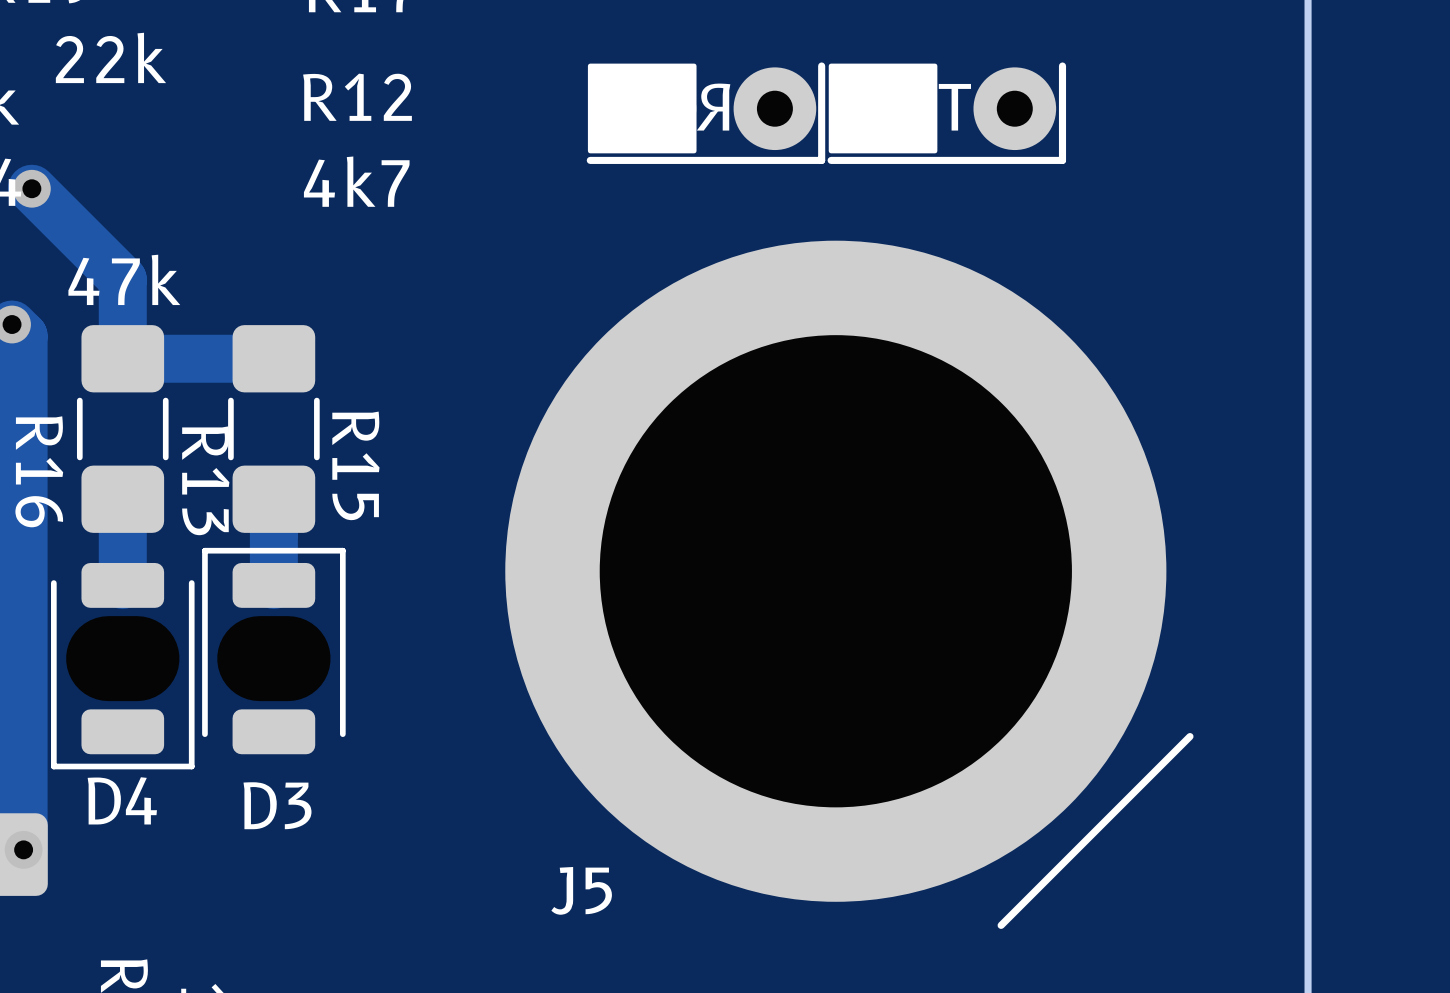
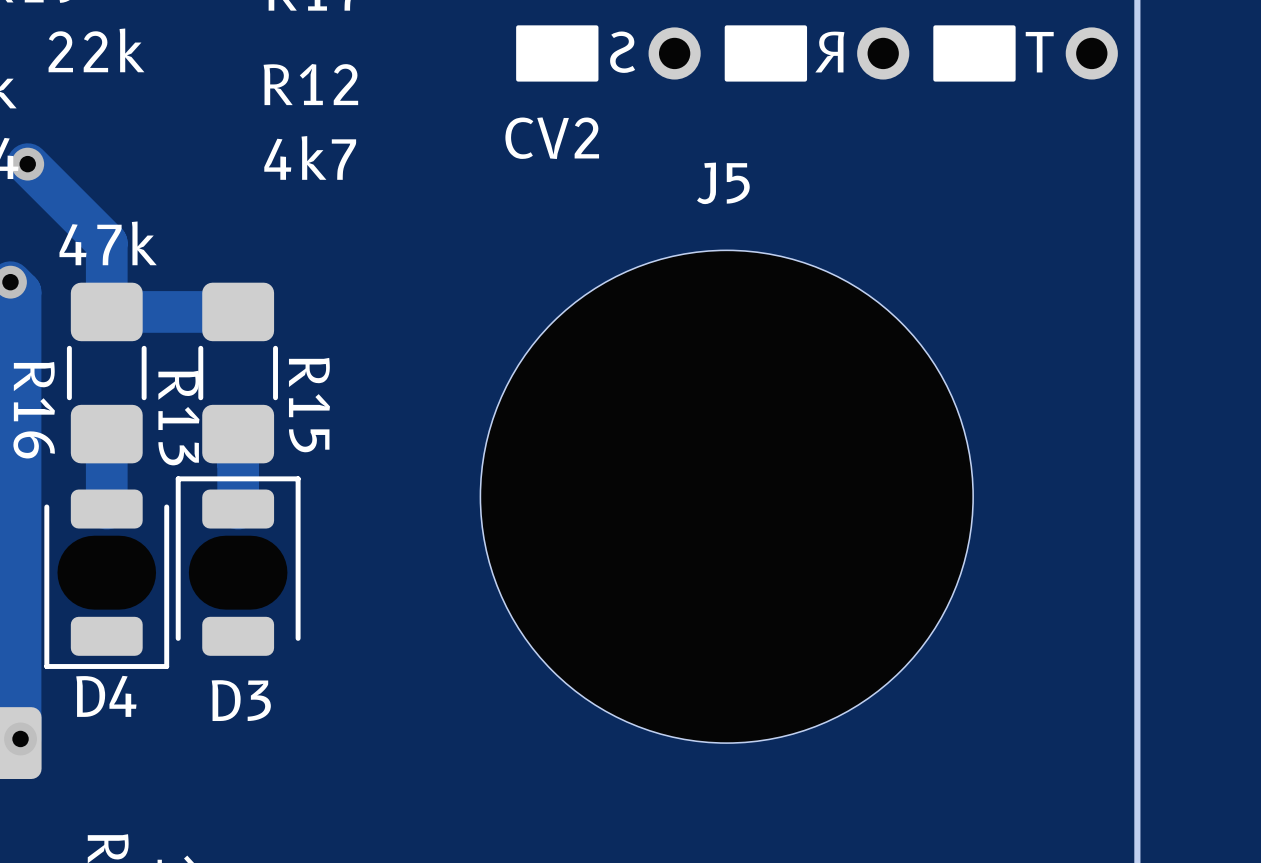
J5 footprint: [505, 62, 1194, 929] -> [480, 25, 1118, 744]
J5 value: none -> CV2 (552, 138)
J5 name position: J5 (581, 890) -> J5 (723, 183)

